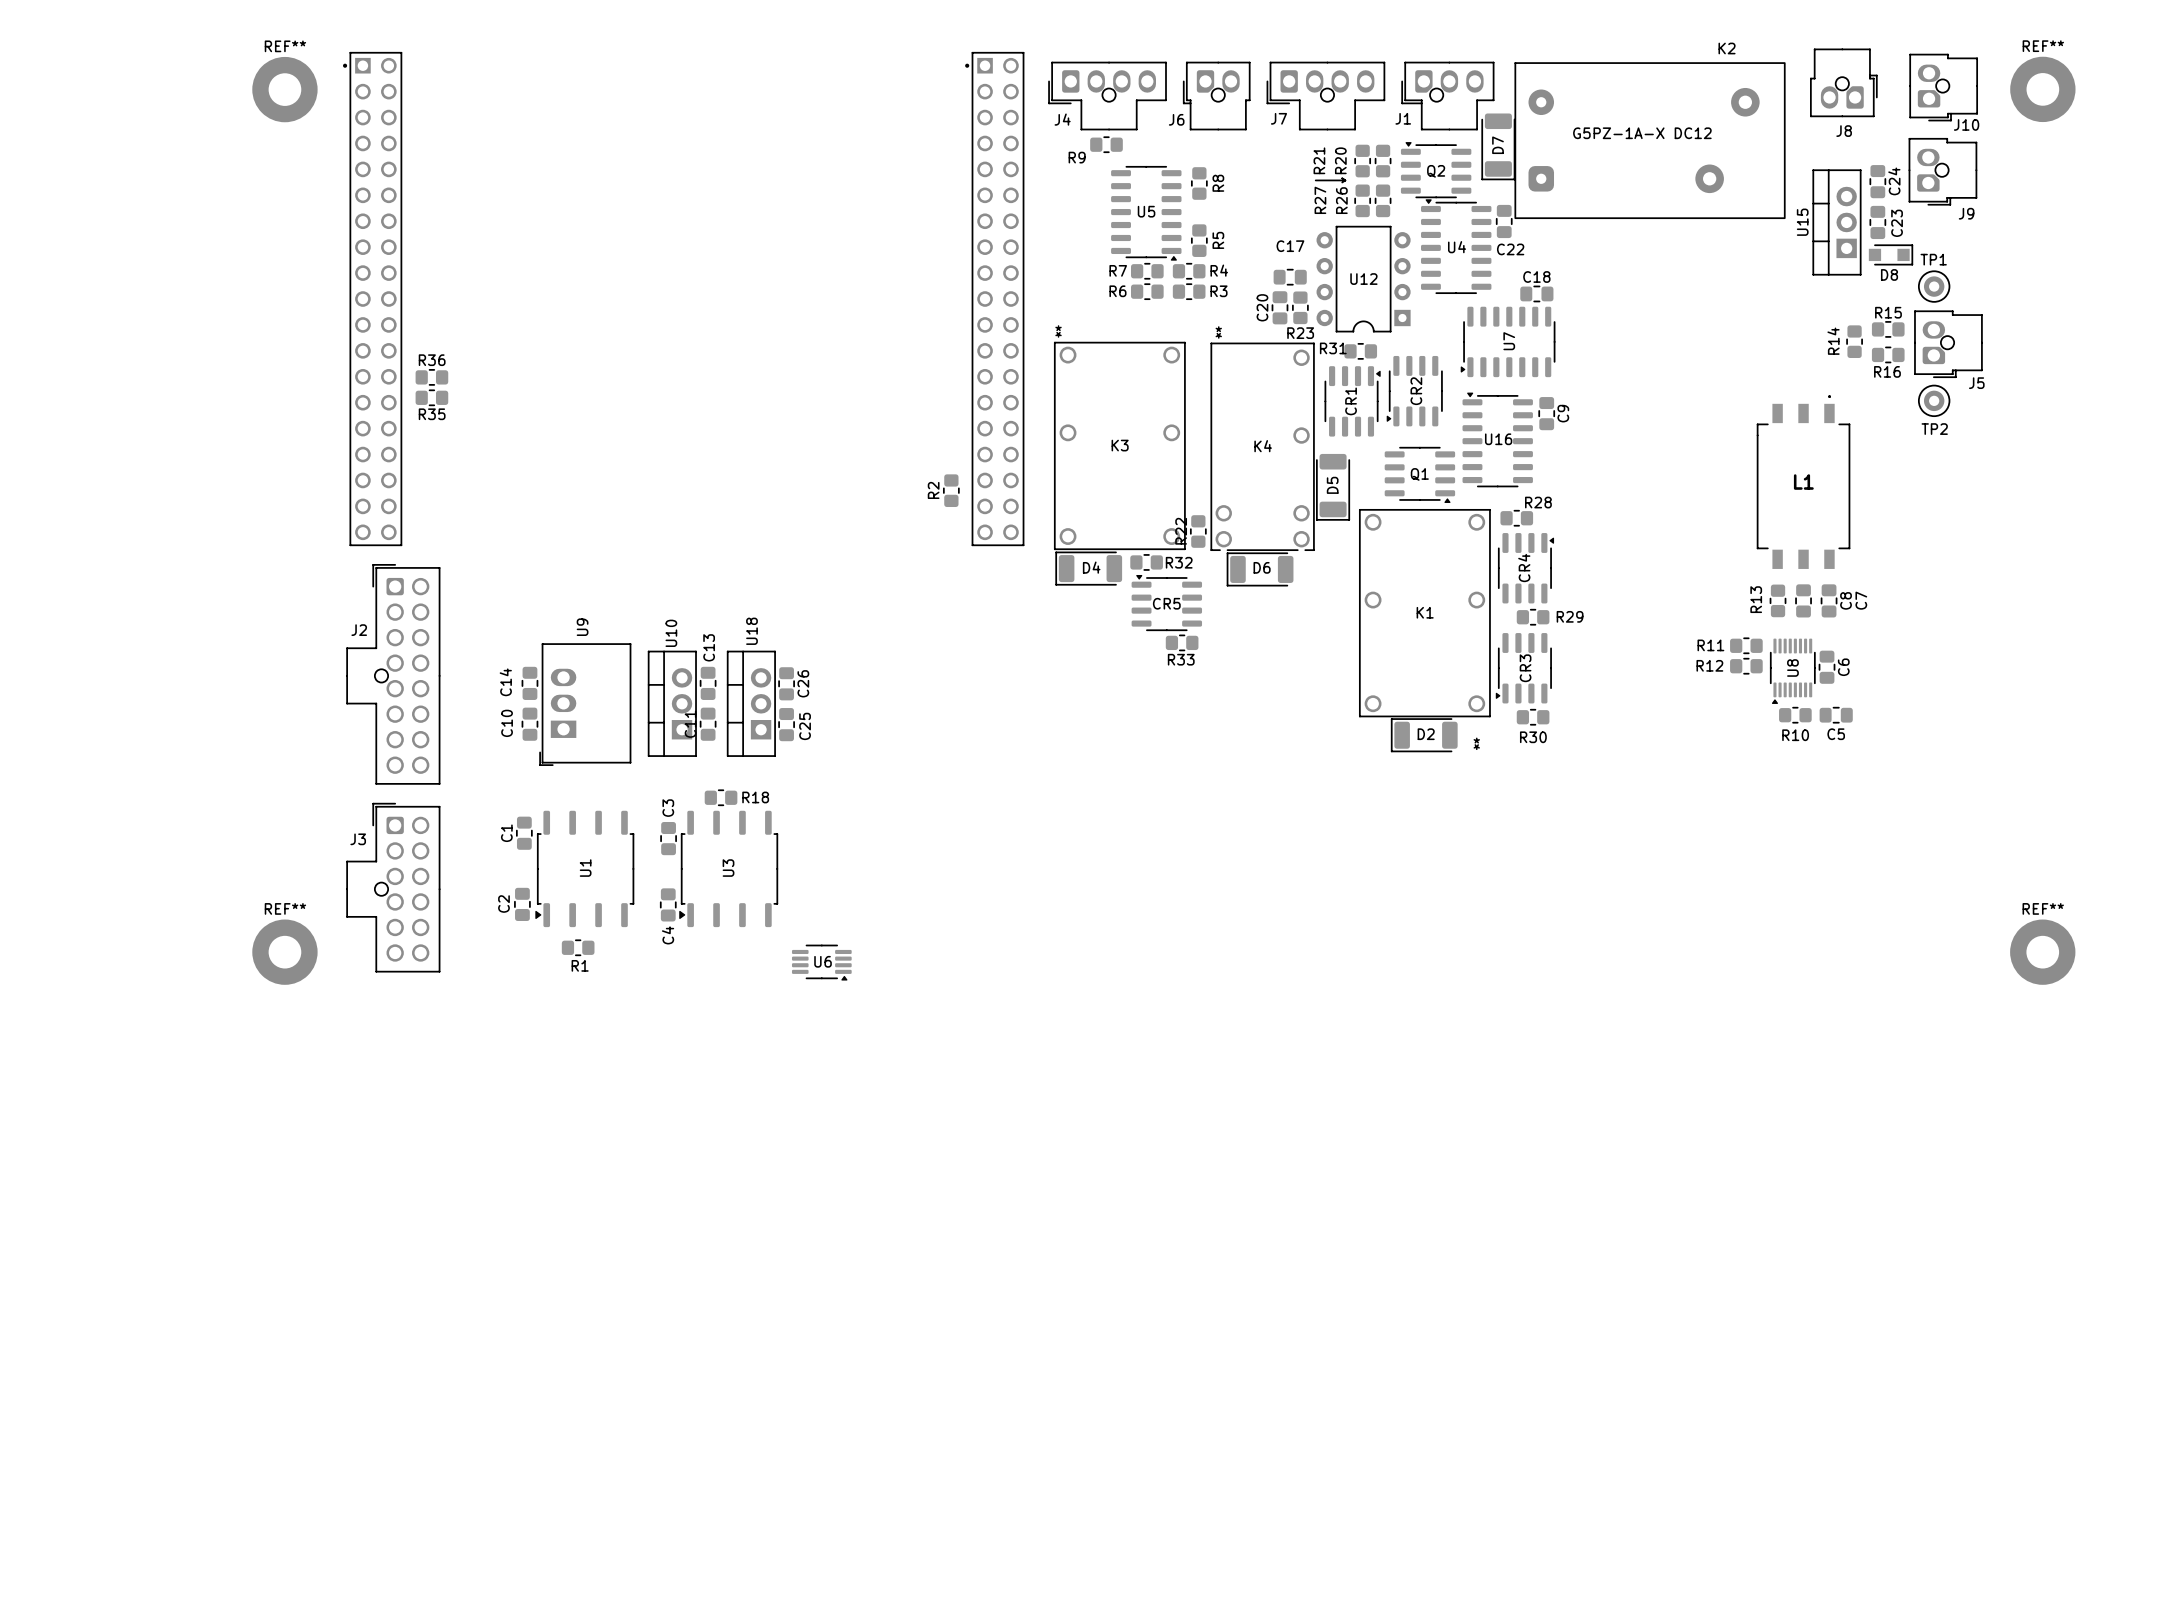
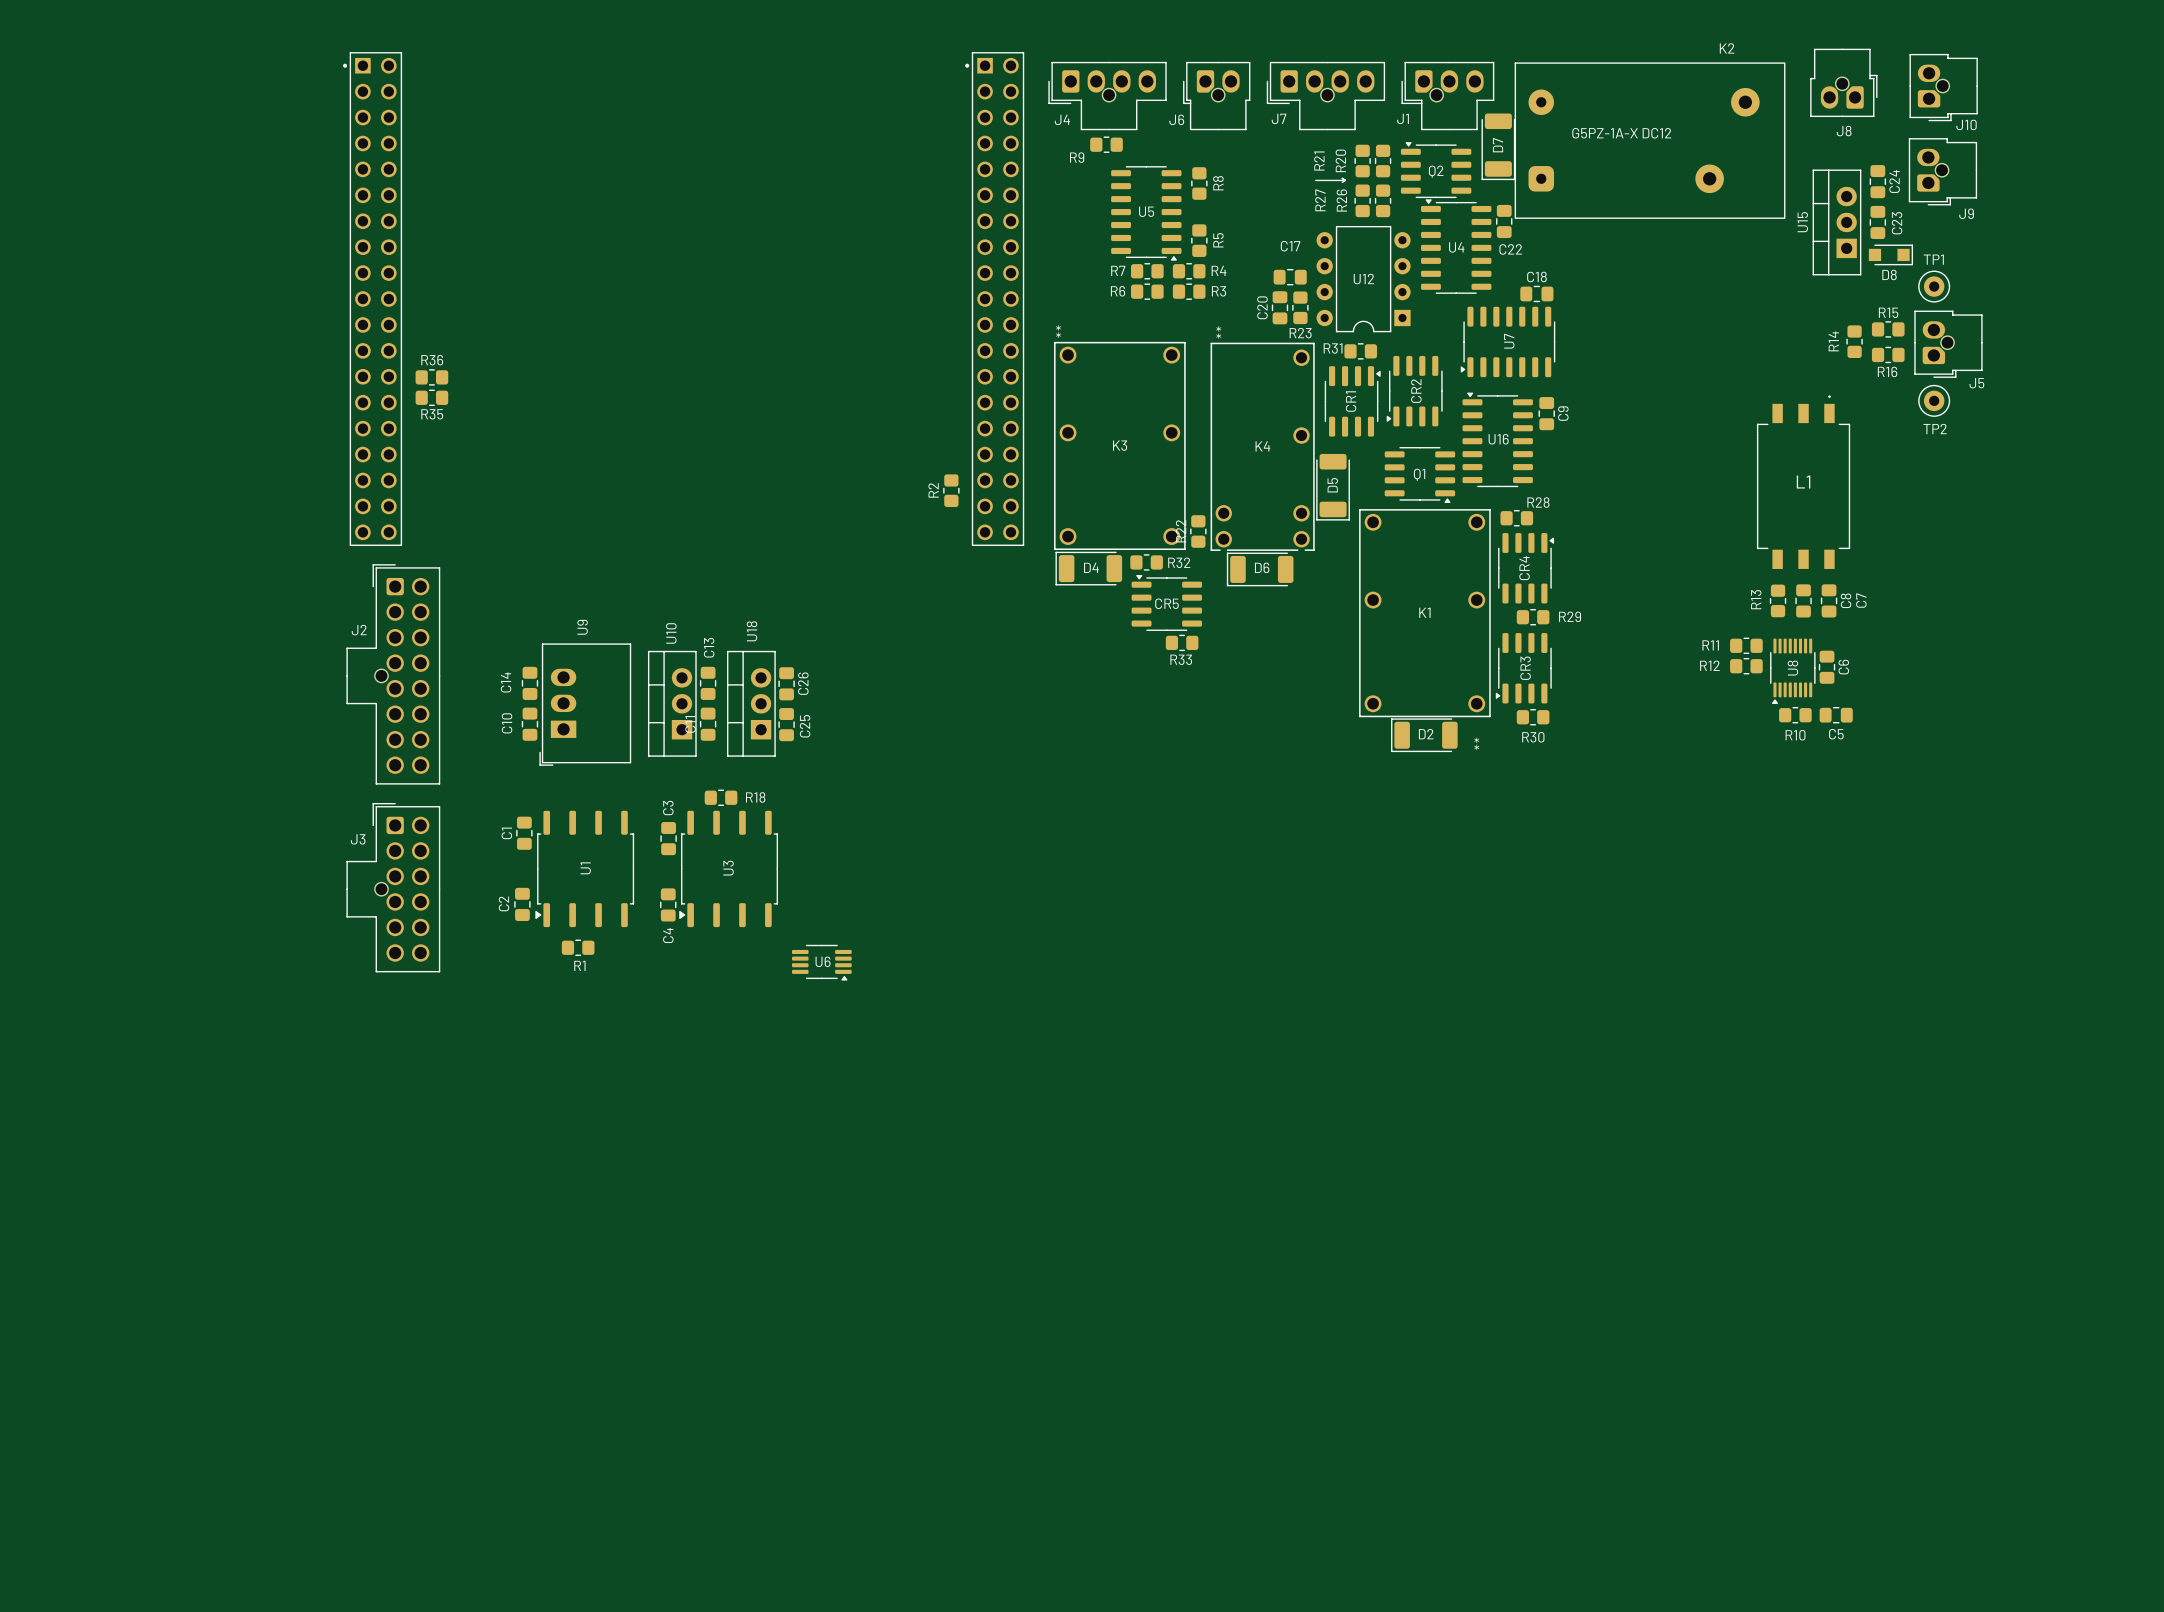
REF**: (284, 89) -> none
REF**: (2042, 89) -> none
REF**: (284, 952) -> none
REF**: (2042, 952) -> none

